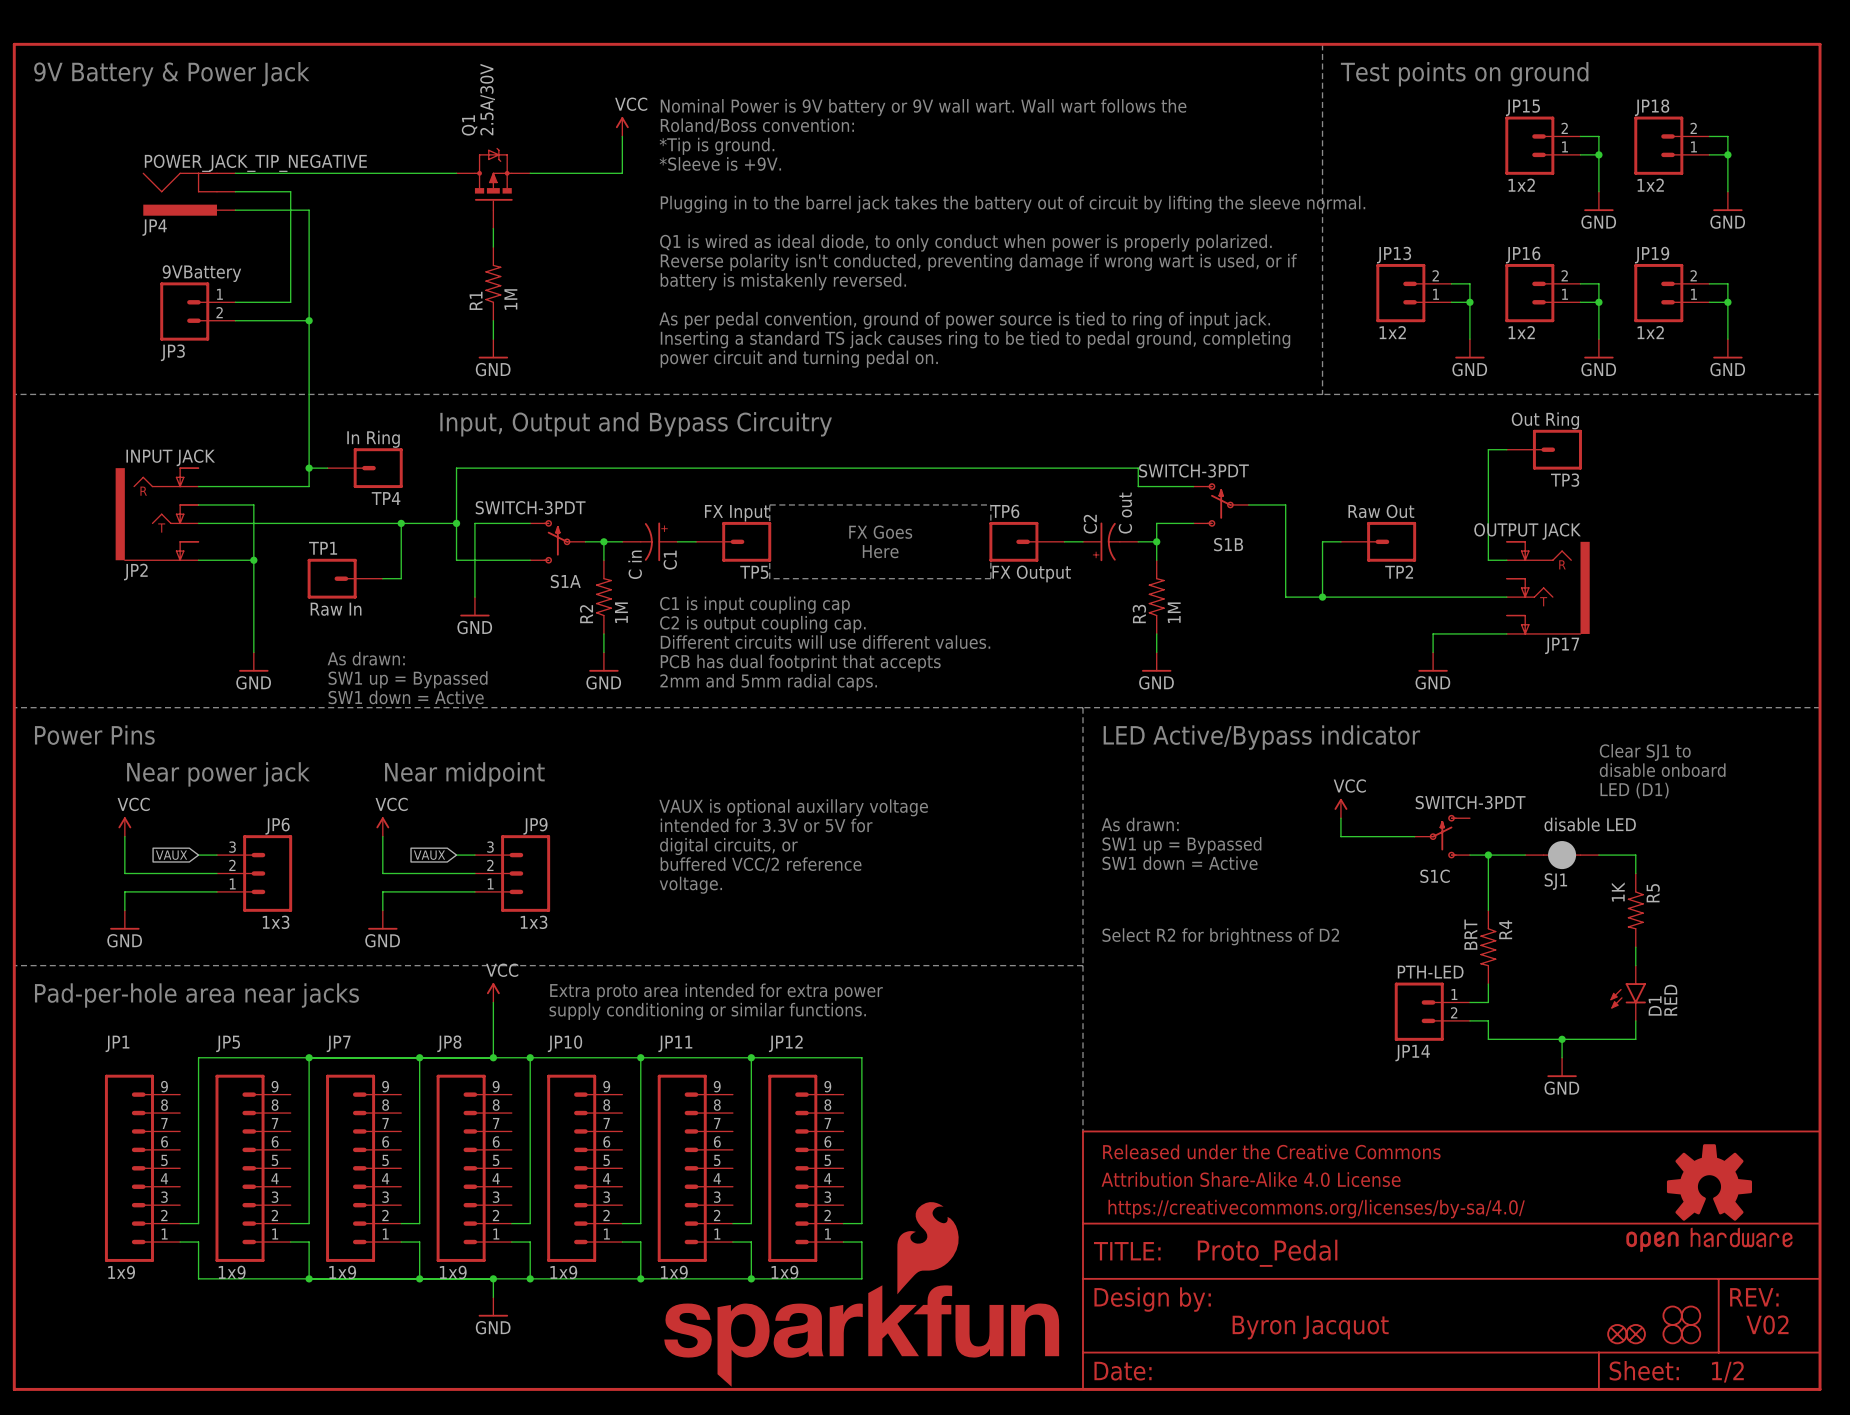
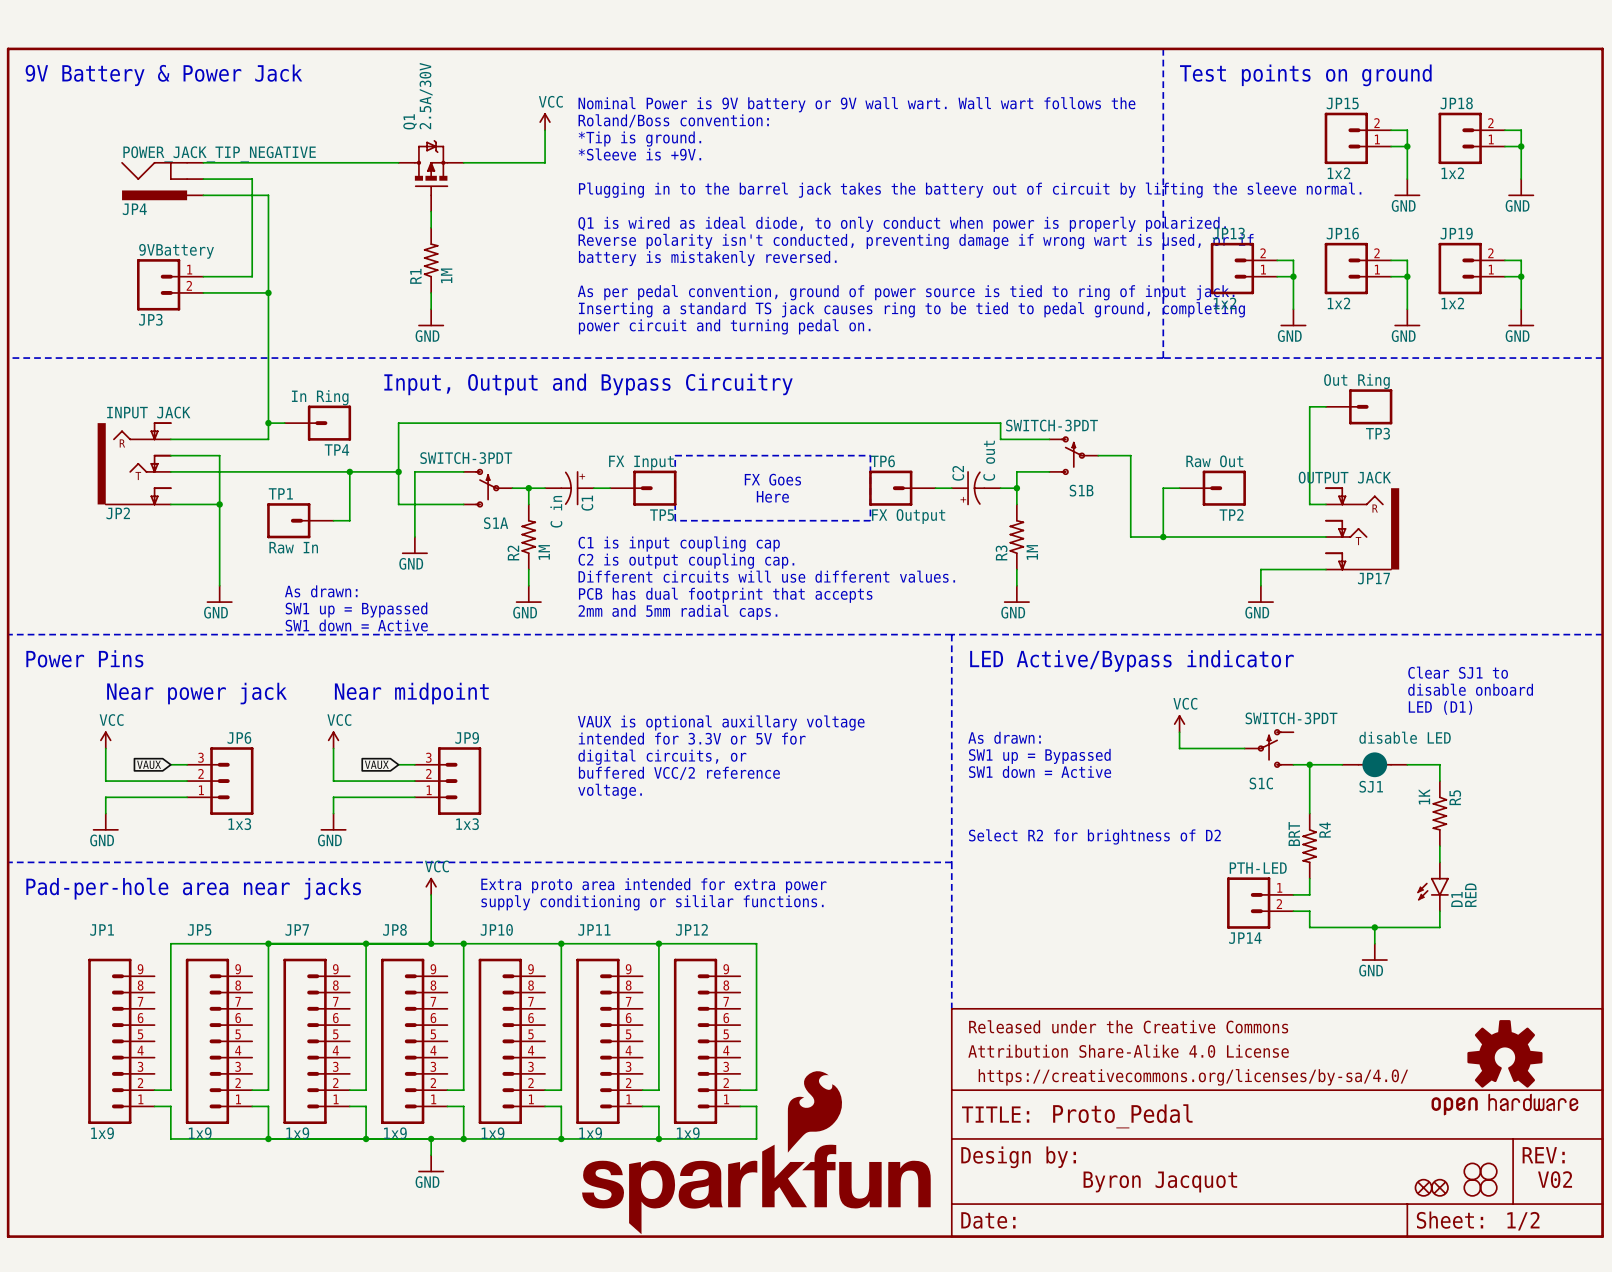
text: supply conditioning or similar functions. (707, 1011) -> supply conditioning or sililar functions. (652, 902)

